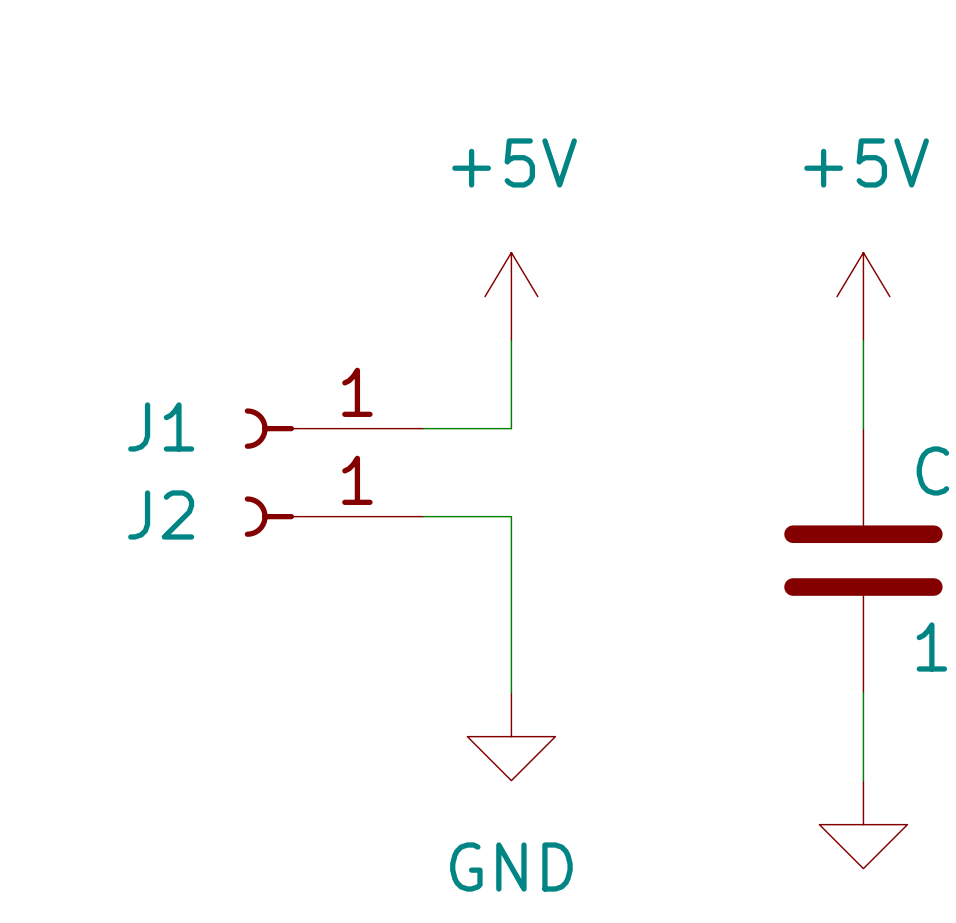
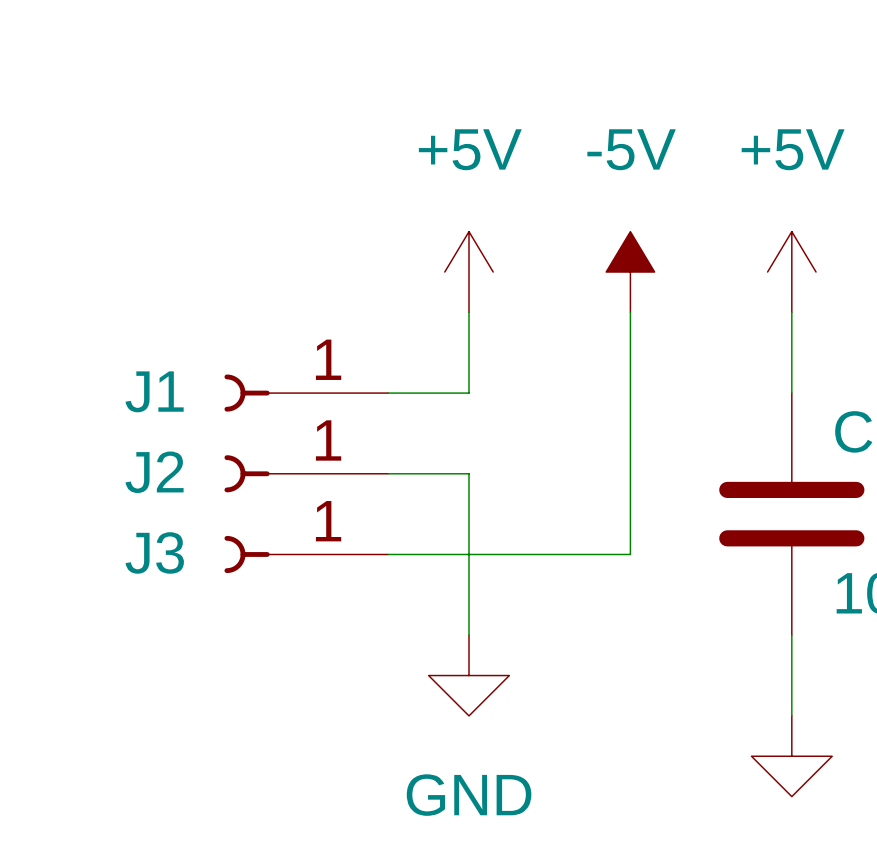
power symbol: none -> -5V (630, 272)
wire: none -> (630, 312) (630, 554) (388, 554)
J3: none -> (306, 554)

